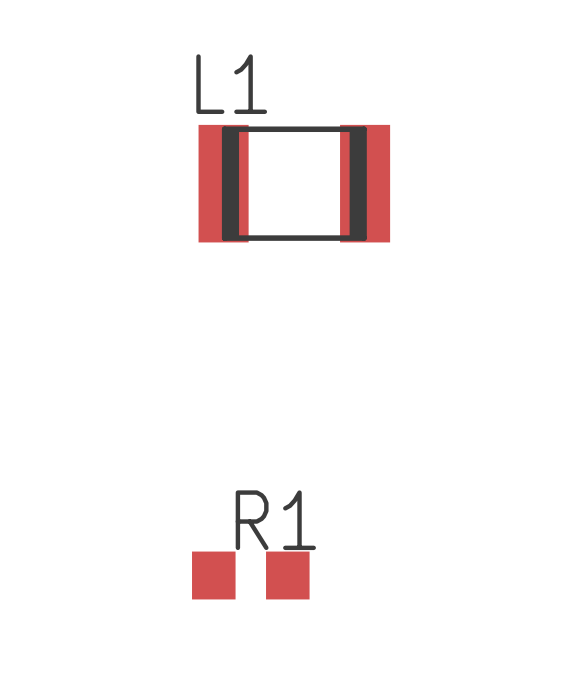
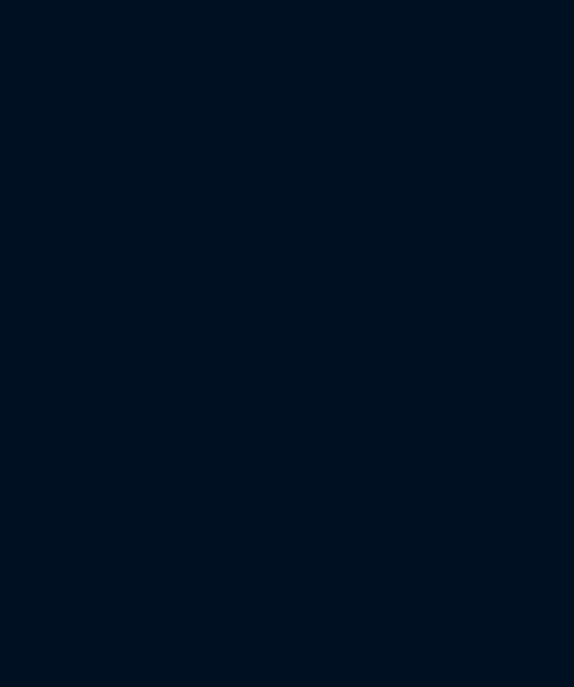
L1: (294, 183) -> none
R1: (250, 575) -> none

